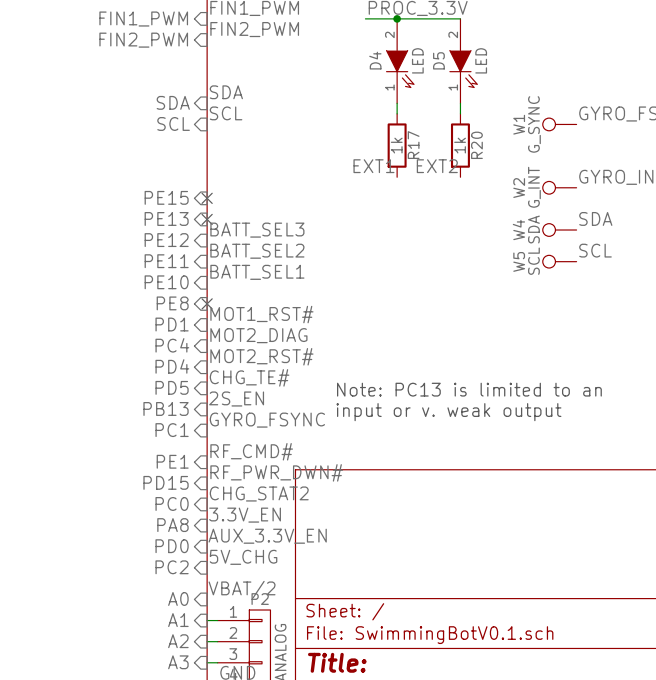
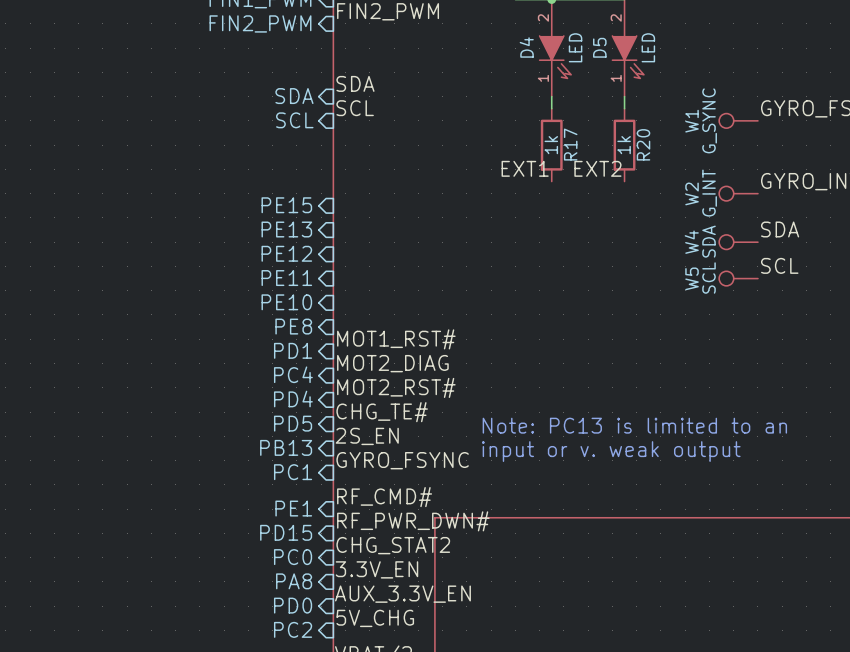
no-connect mark: (207, 198) -> none
no-connect mark: (207, 219) -> none
label: BATT_SEL3 (257, 230) -> none
label: BATT_SEL2 (257, 251) -> none
label: BATT_SEL1 (257, 272) -> none
no-connect mark: (207, 303) -> none

